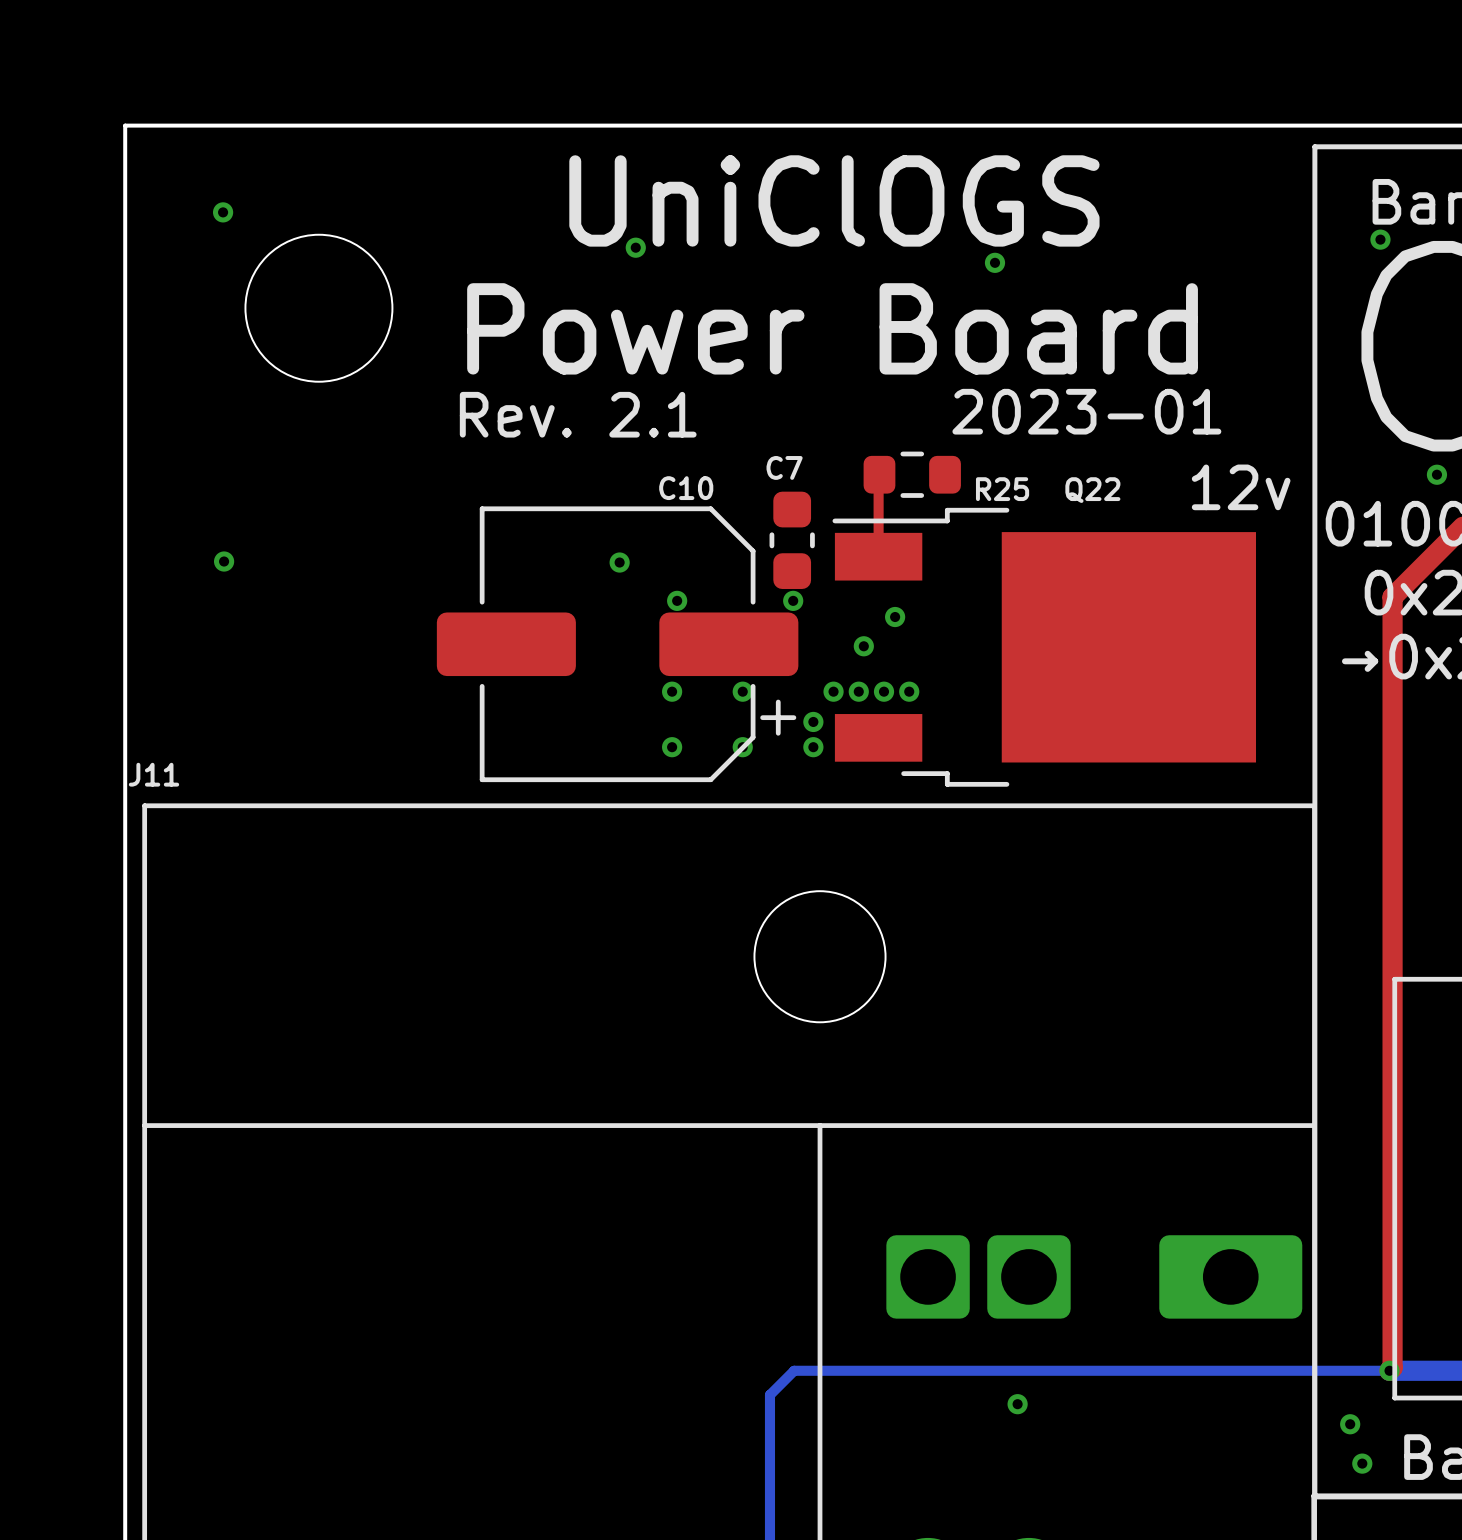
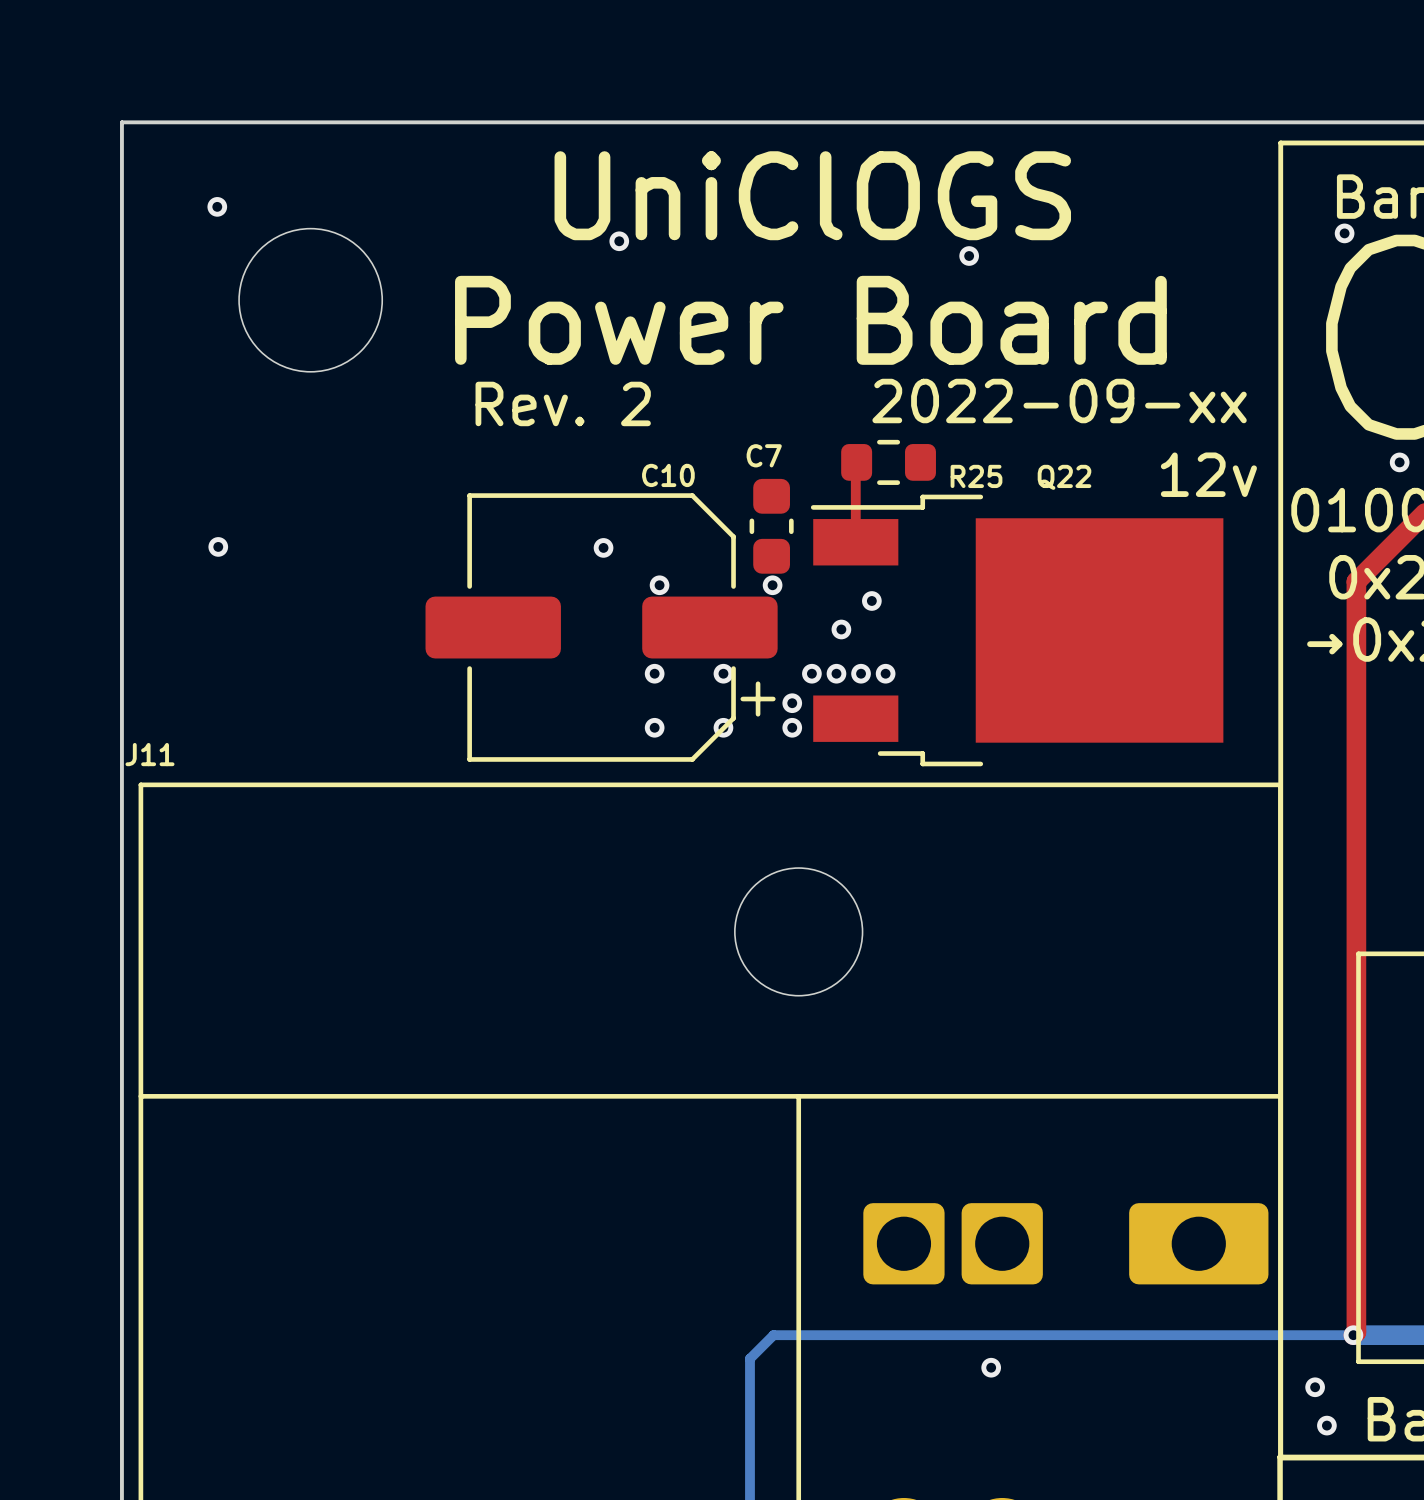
text: 2023-01 (1086, 411) -> 2022-09-xx (1059, 401)
text: Rev. 2.1 (578, 414) -> Rev. 2 (563, 403)

